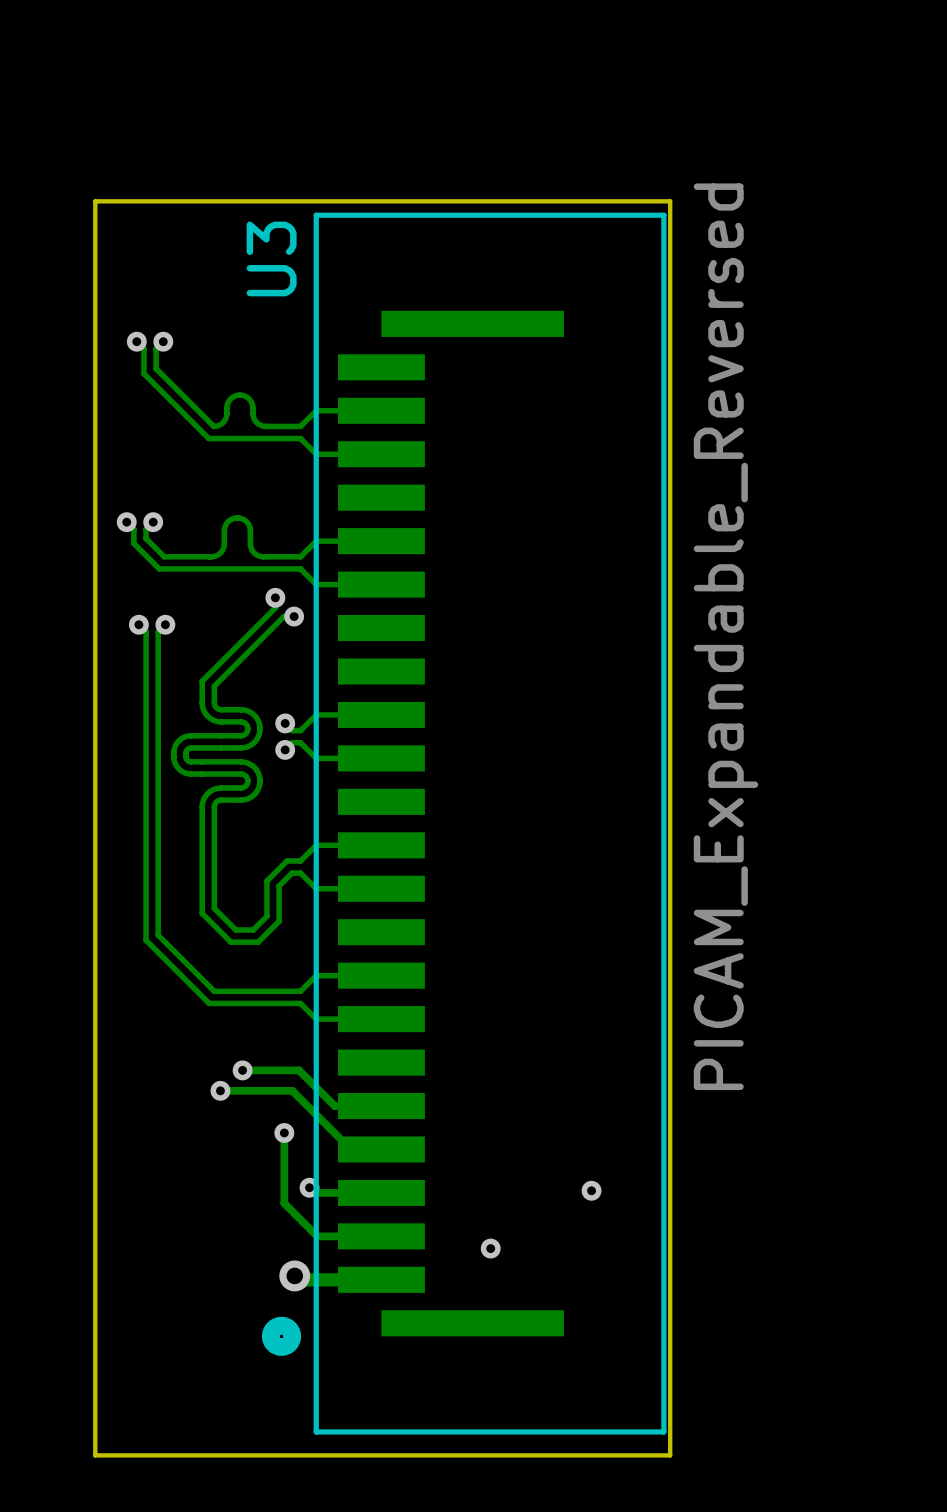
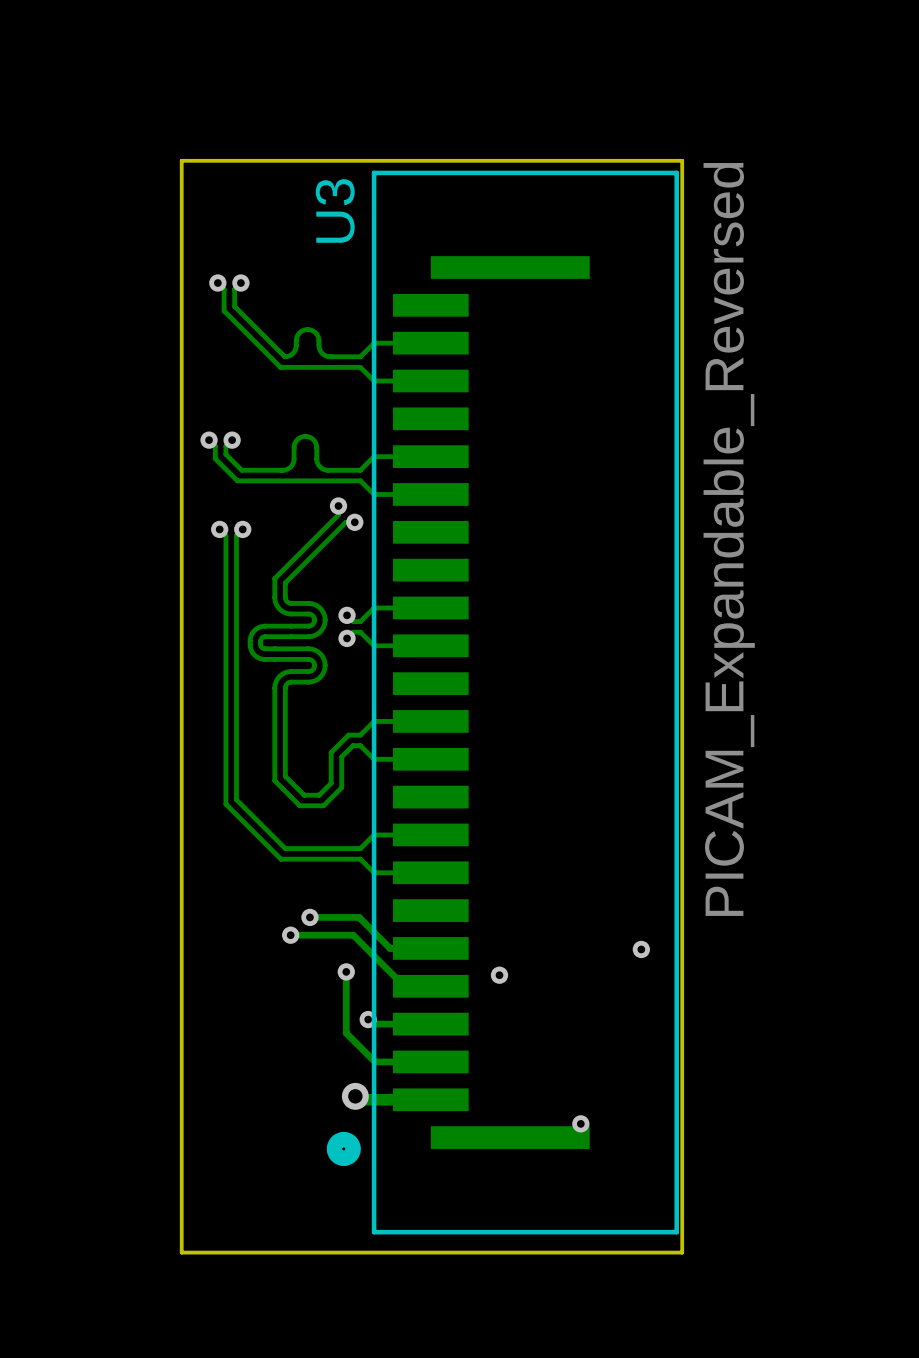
via: none -> (641, 949)
via: none -> (499, 975)
via: (591, 1190) -> none
via: (490, 1248) -> none
via: none -> (580, 1123)

